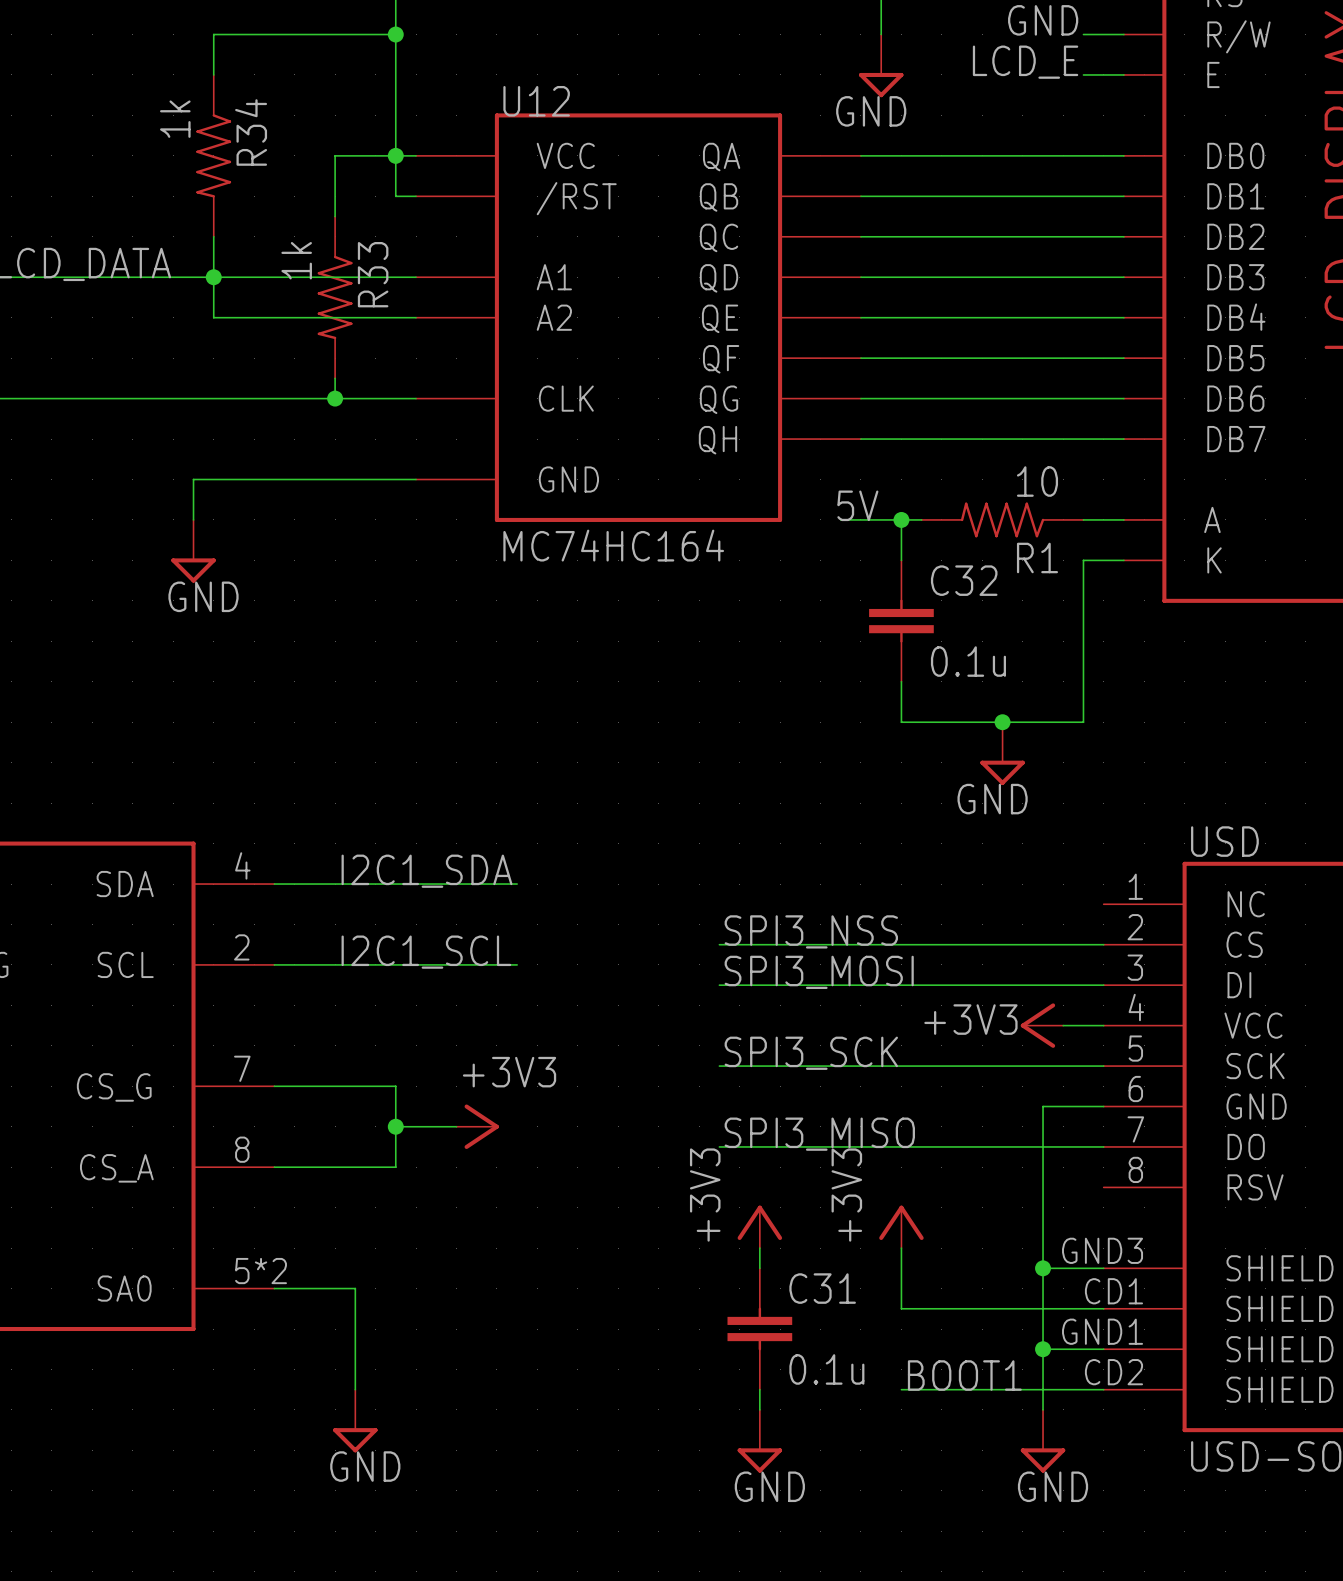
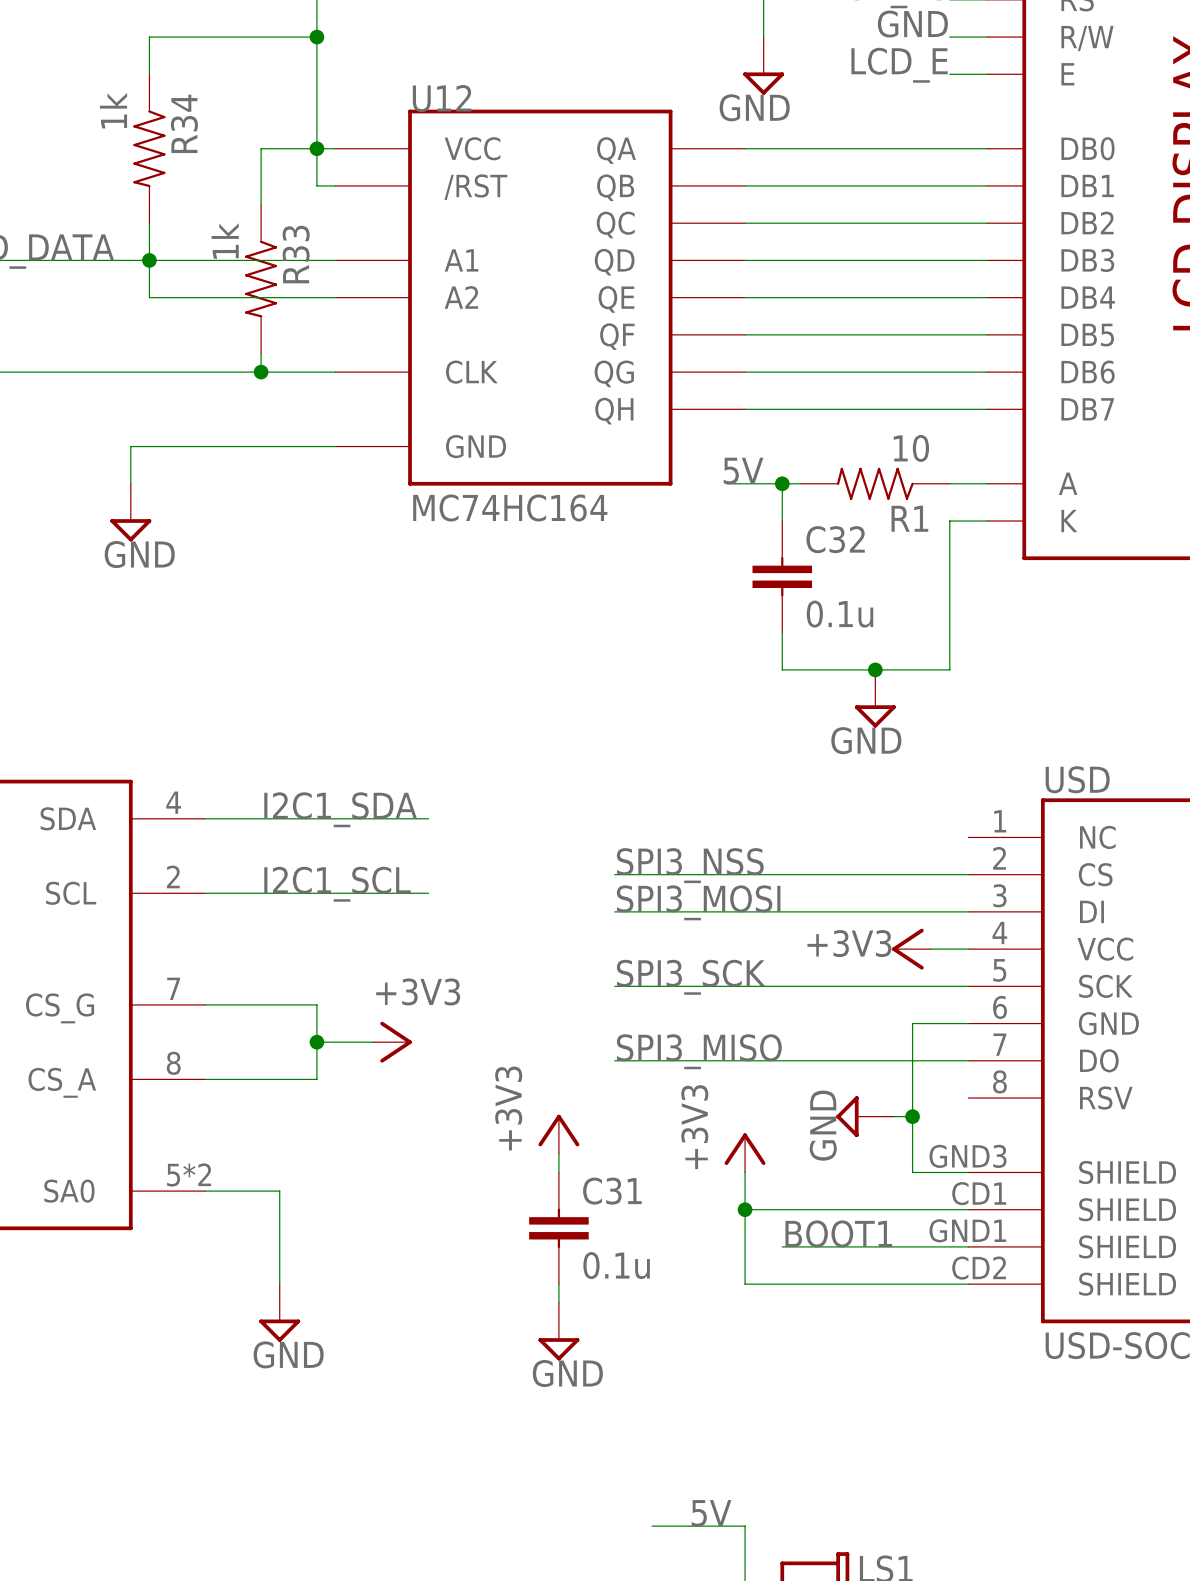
power symbol: none -> GND (865, 1116)
wire: none -> (893, 1116) (912, 1116)
power symbol: none -> +3V3 (558, 1134)
power symbol: +3V3 (759, 1226) -> none
power symbol position: +3V3 (901, 1226) -> +3V3 (745, 1152)
wire: (759, 1248) (759, 1268) -> (558, 1153) (558, 1172)
wire: (901, 1248) (901, 1308) -> (745, 1209) (782, 1209)
wire: none -> (745, 1172) (745, 1284) (782, 1284)
wire: (1043, 1268) (1043, 1409) -> none
junction position: (1043, 1268) -> (912, 1116)
junction: none -> (745, 1209)
C31 position: (759, 1329) -> (558, 1228)
wire: none -> (782, 1246) (912, 1246)
junction: (1043, 1349) -> none
label position: BOOT1 (964, 1375) -> BOOT1 (838, 1233)
wire: (759, 1389) (759, 1409) -> (558, 1284) (558, 1302)
power symbol position: GND (759, 1441) -> GND (558, 1331)
power symbol: GND (1043, 1441) -> none

